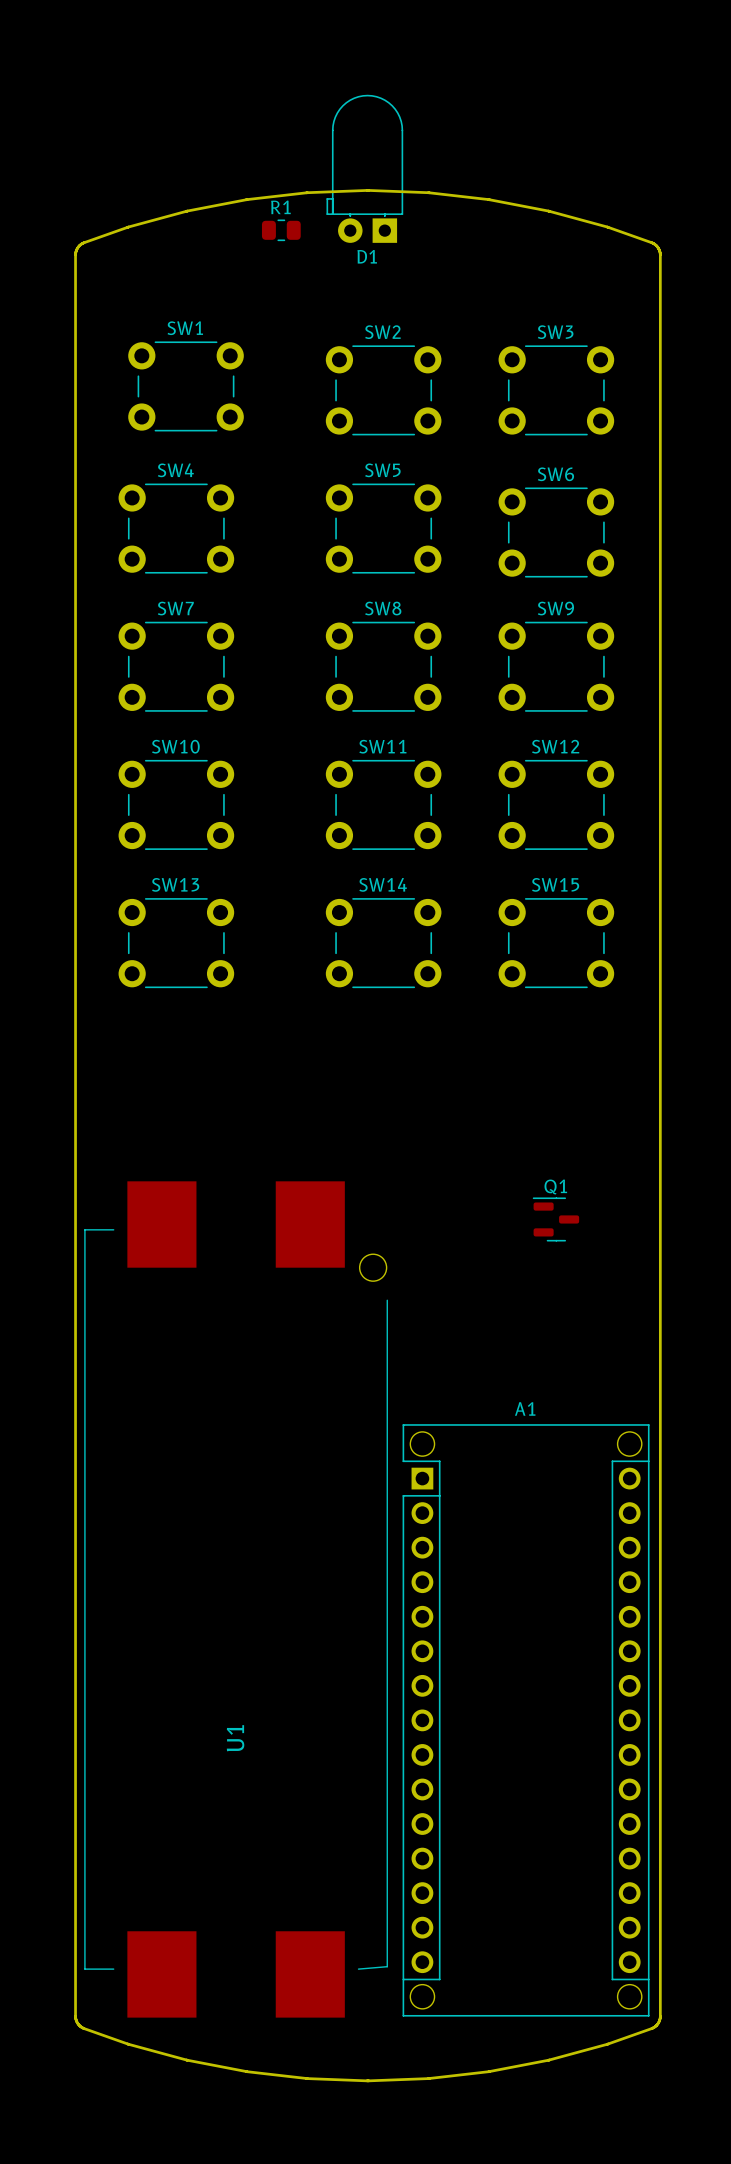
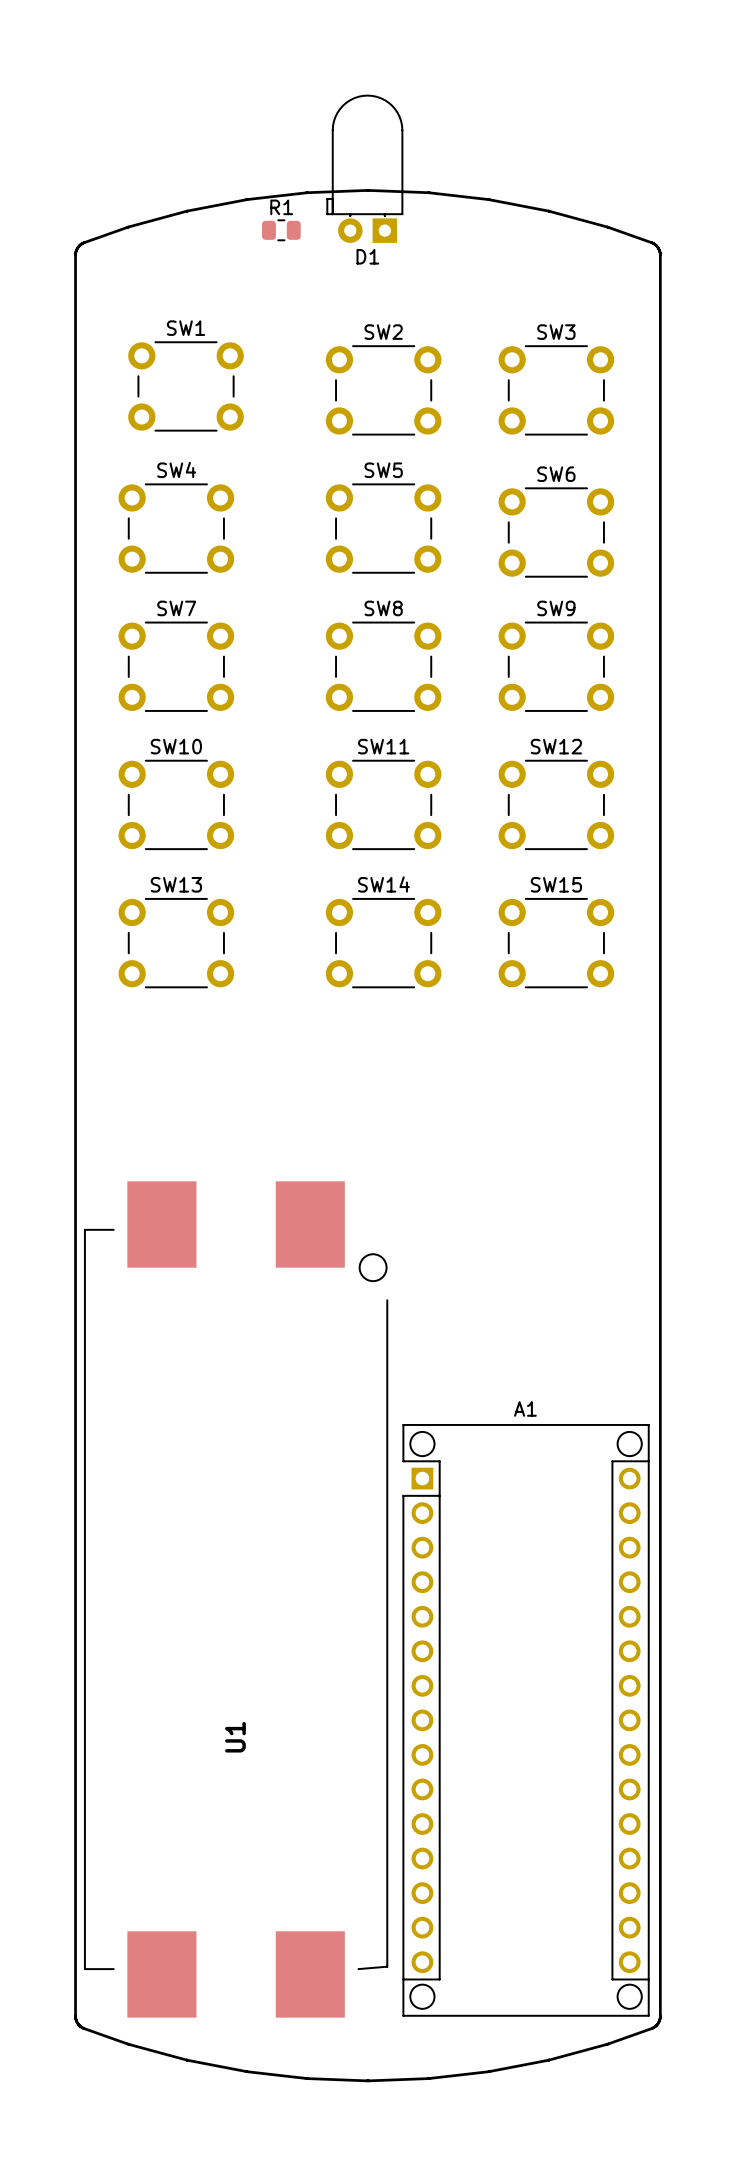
Q1: (555, 1219) -> none

